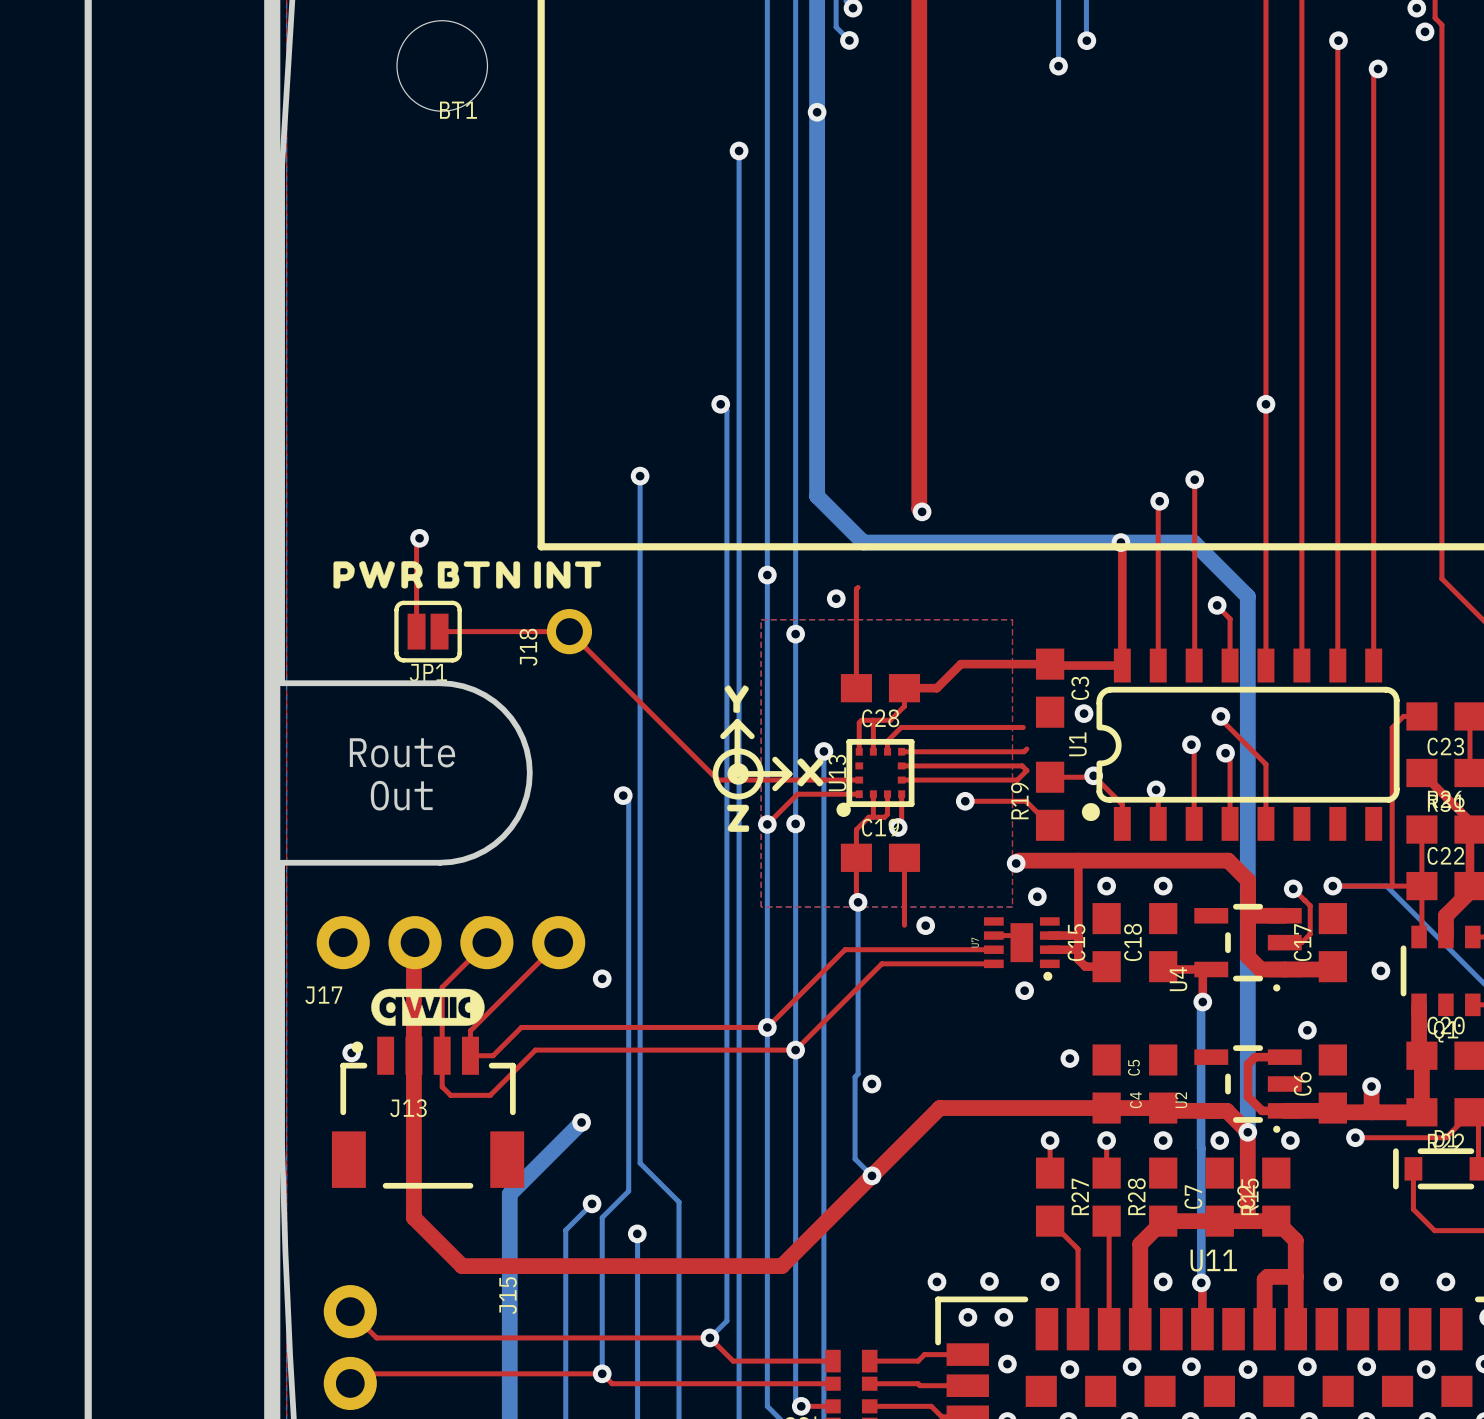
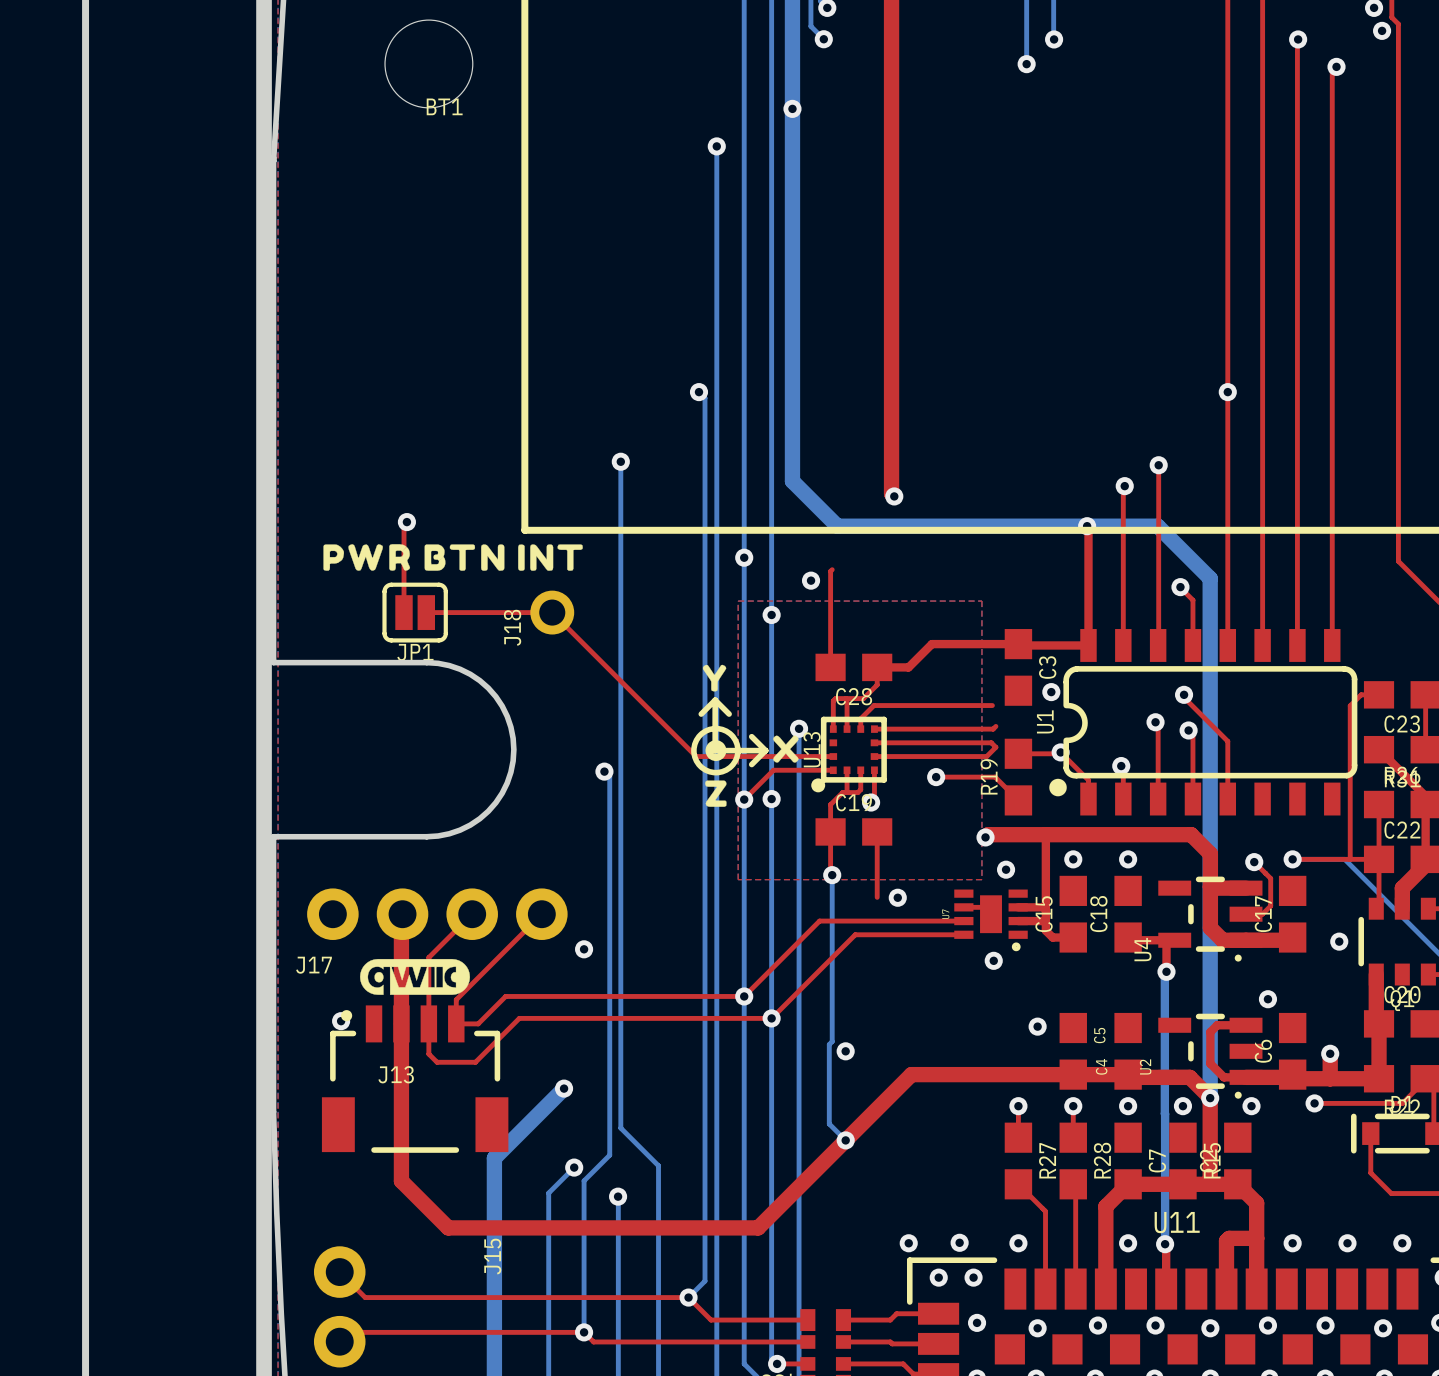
text: Route (402, 752) -> none
text: Out (401, 795) -> none

